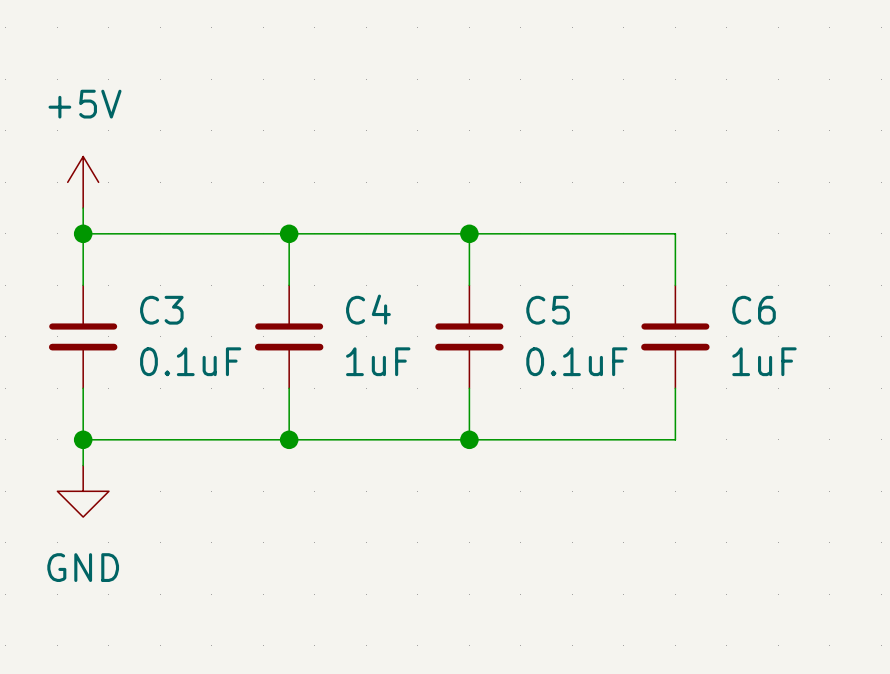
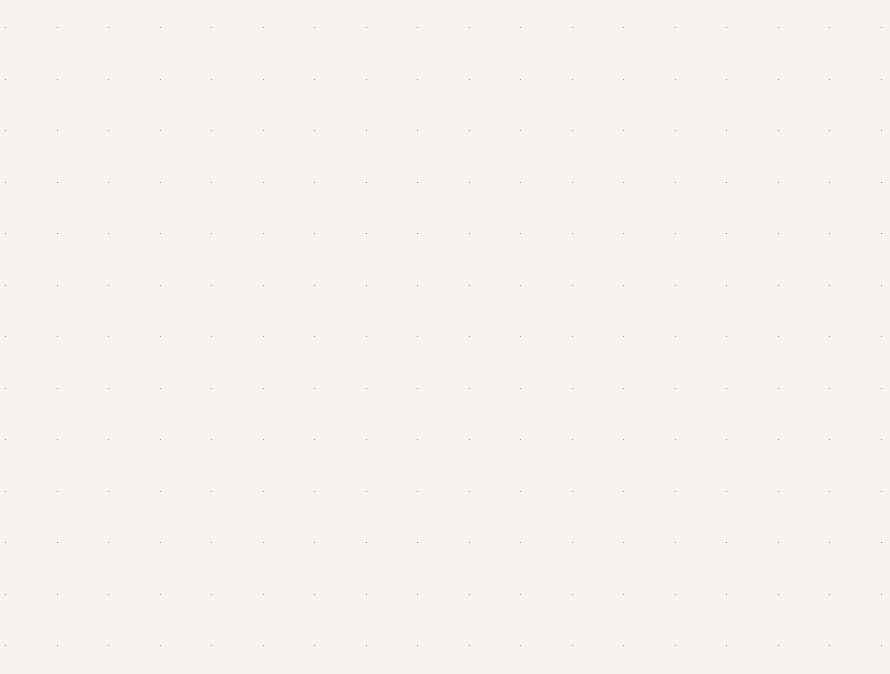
power symbol: +5V (83, 182) -> none
wire: (83, 208) (83, 285) -> none
wire: (83, 233) (675, 233) (675, 285) -> none
junction: (83, 233) -> none
wire: (289, 233) (289, 285) -> none
junction: (289, 233) -> none
wire: (469, 233) (469, 285) -> none
junction: (469, 233) -> none
C3: 0.1uF (83, 336) -> none
C4: 1uF (289, 336) -> none
C5: 0.1uF (469, 336) -> none
C6: 1uF (675, 336) -> none
wire: (83, 388) (83, 465) -> none
wire: (289, 388) (289, 439) -> none
wire: (469, 388) (469, 439) -> none
wire: (675, 388) (675, 439) (83, 439) -> none
junction: (83, 439) -> none
junction: (289, 439) -> none
junction: (469, 439) -> none
power symbol: GND (83, 491) -> none

